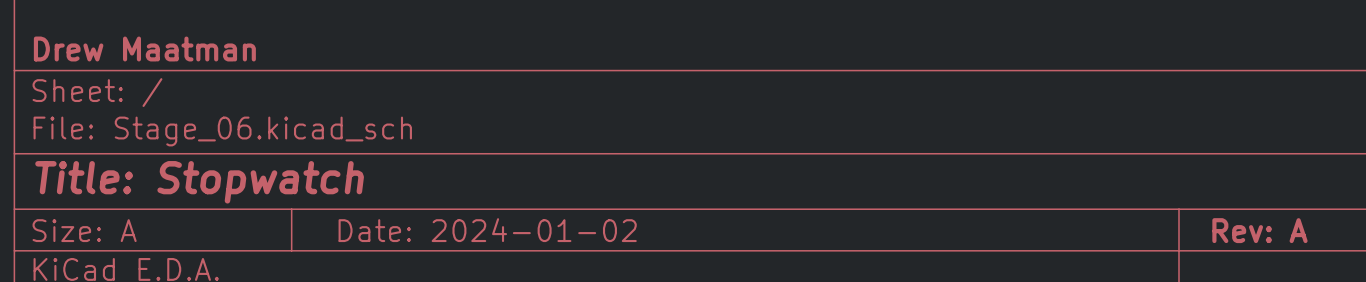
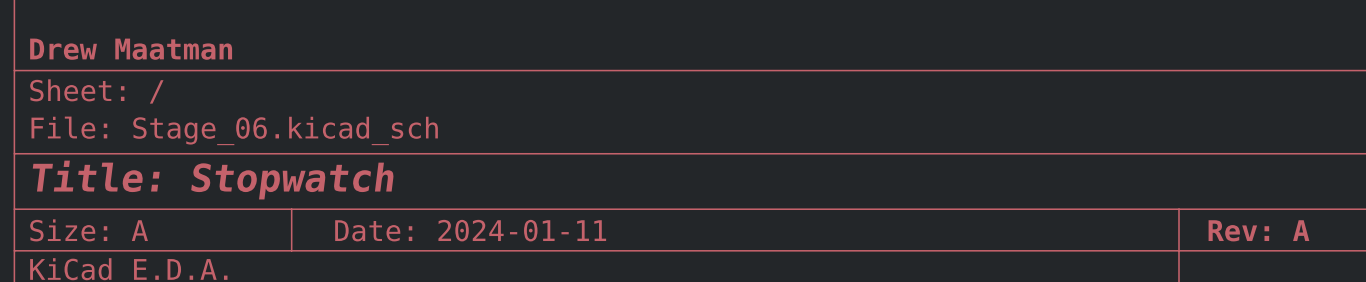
title block: Date: 2024-01-02 (487, 230) -> Date: 2024-01-11 (470, 230)

